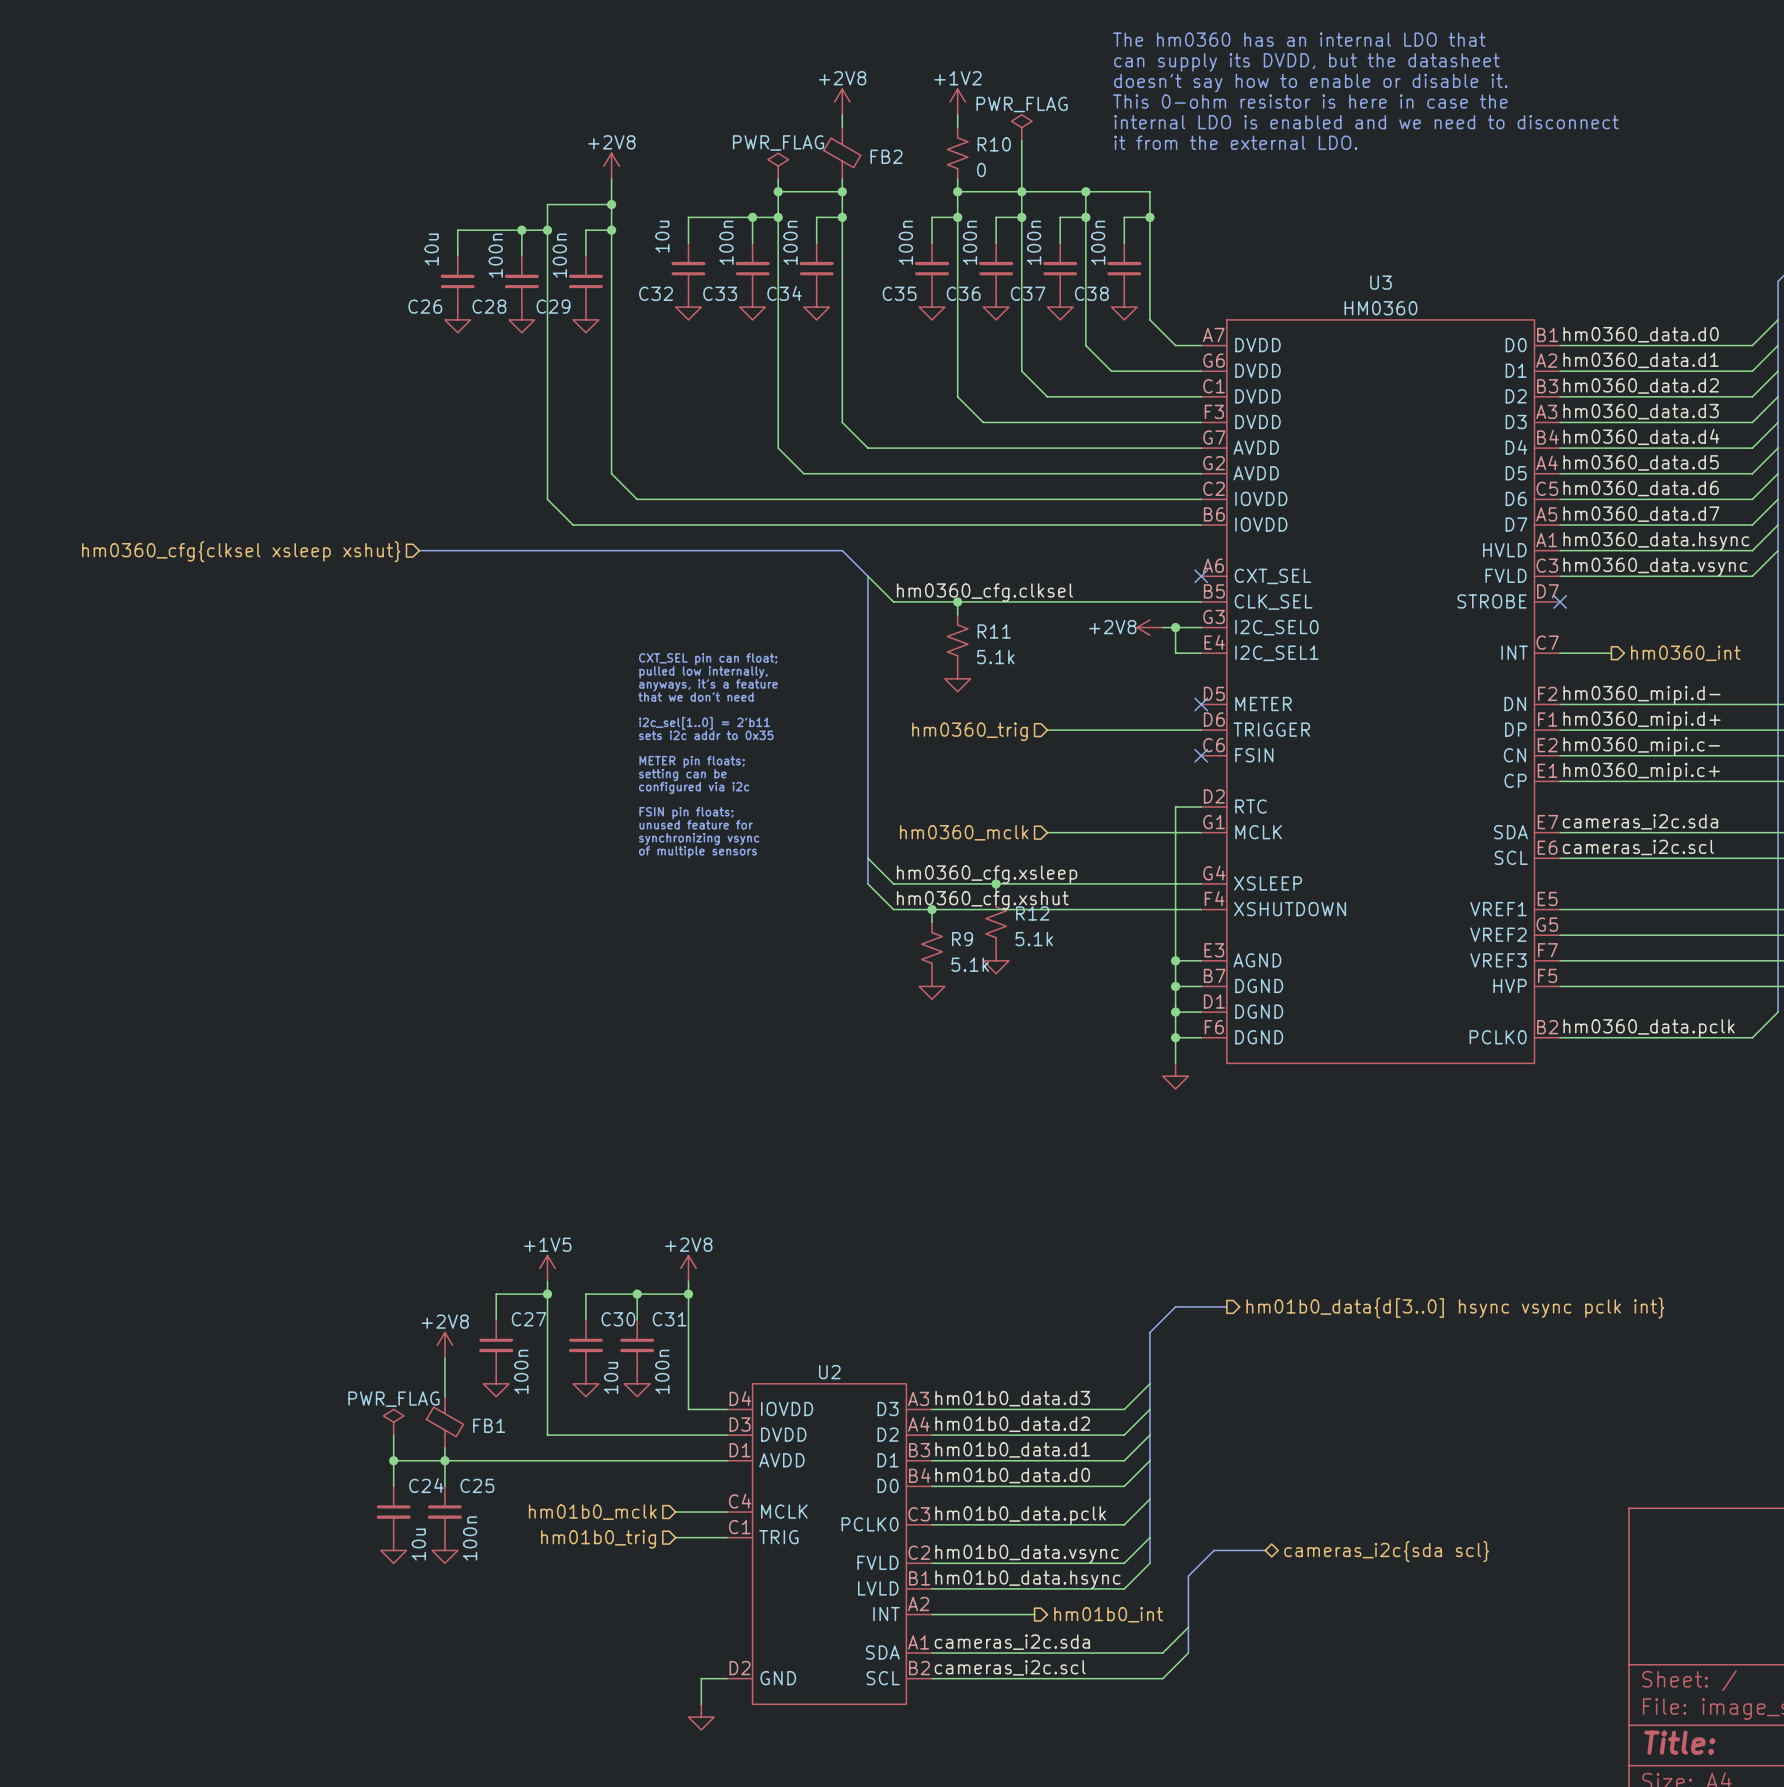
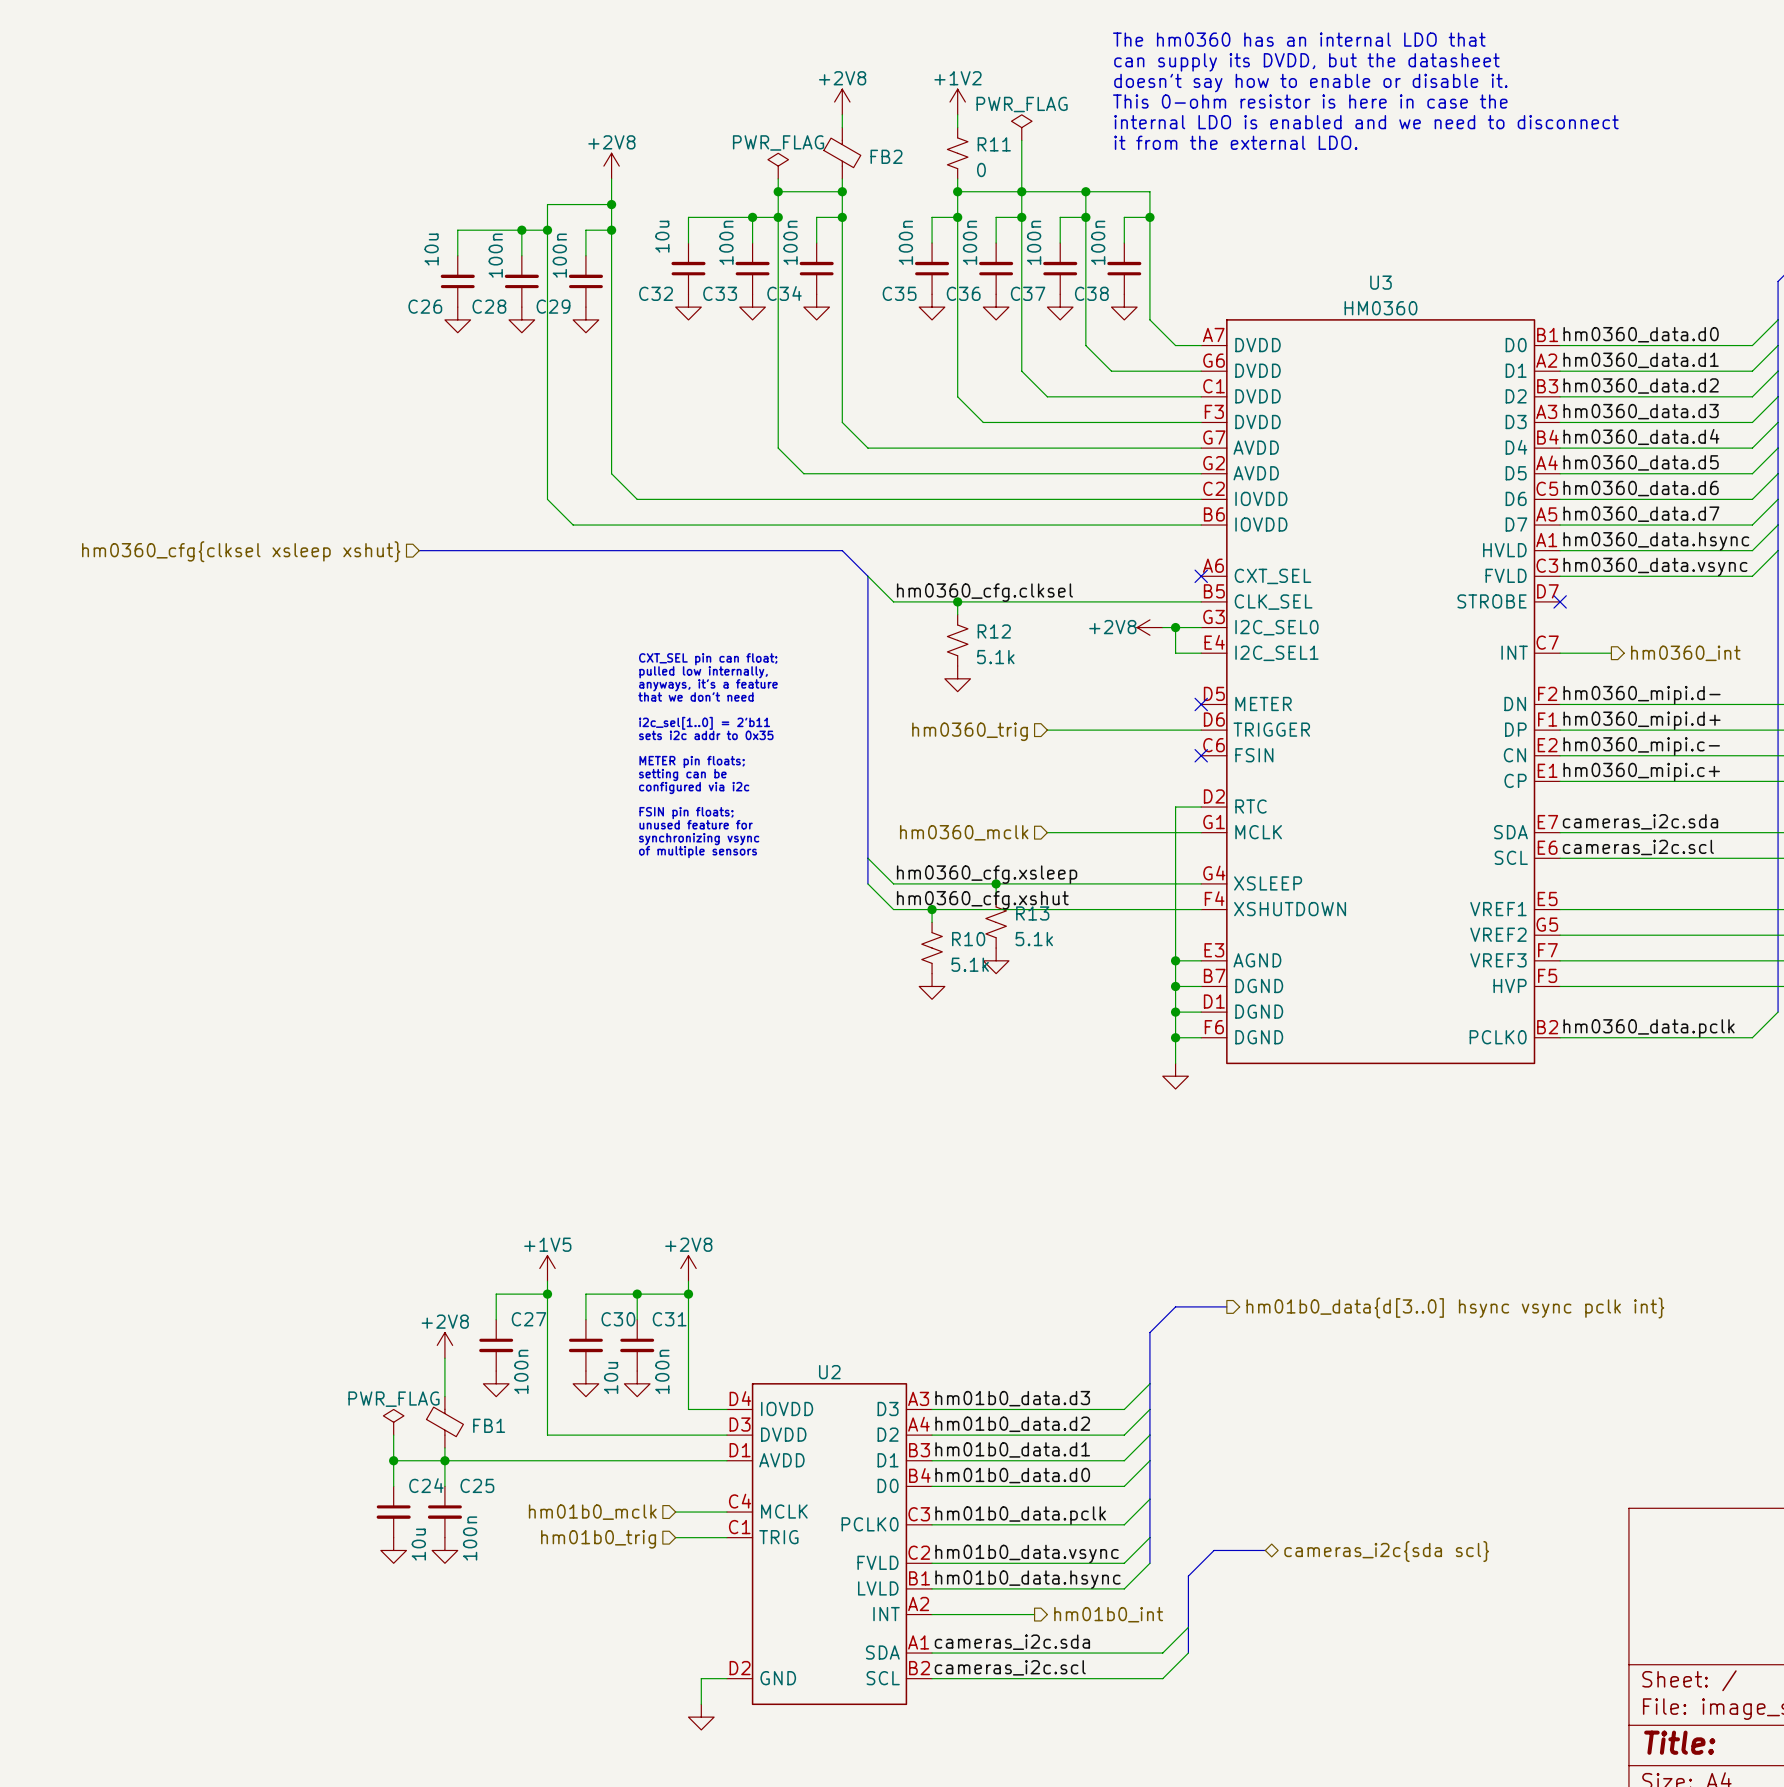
R10 name: R10 (994, 144) -> R11 (994, 144)
R11 name: R11 (994, 631) -> R12 (994, 631)
R12 name: R12 (1032, 913) -> R13 (1032, 913)
R9 name: R9 (962, 939) -> R10 (968, 939)

